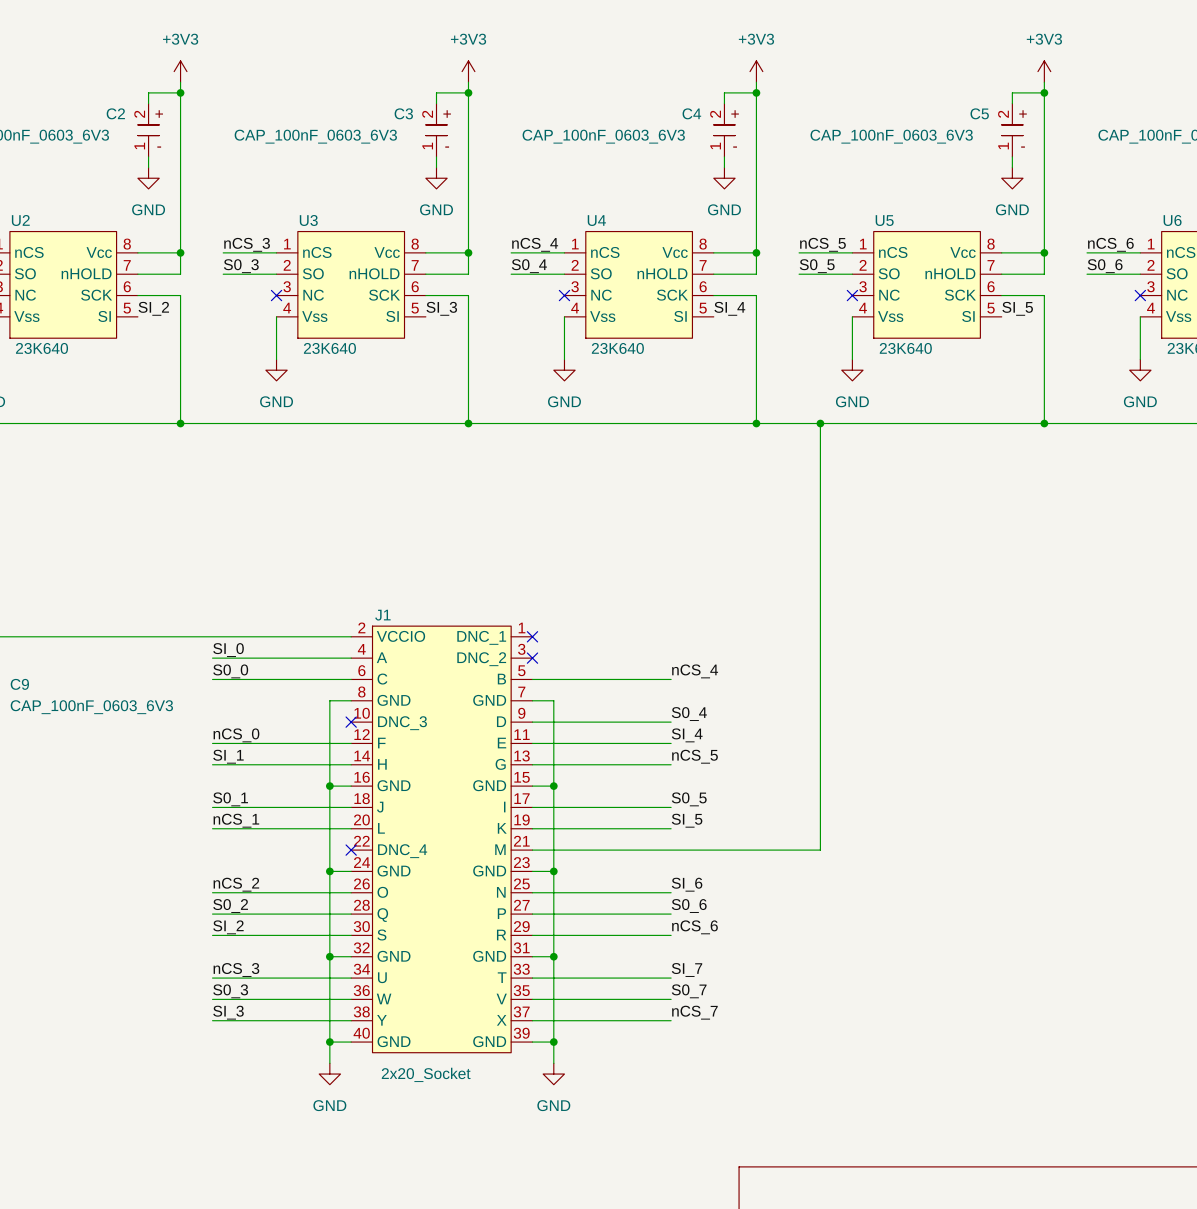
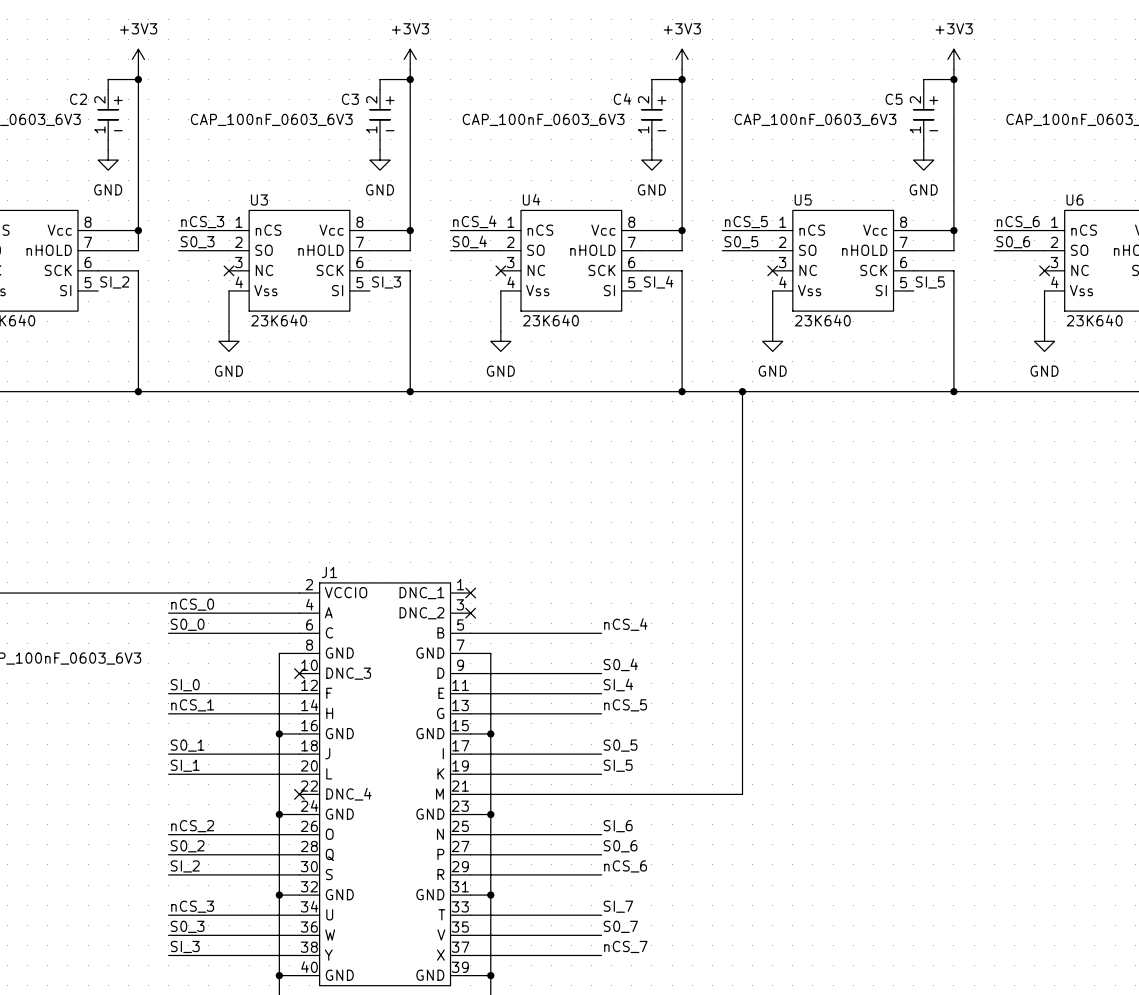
label: SI_0 (228, 650) -> nCS_0 (192, 604)
label: nCS_0 (236, 735) -> SI_0 (185, 685)
label: SI_1 (228, 756) -> nCS_1 (192, 705)
label: nCS_1 (236, 820) -> SI_1 (185, 765)

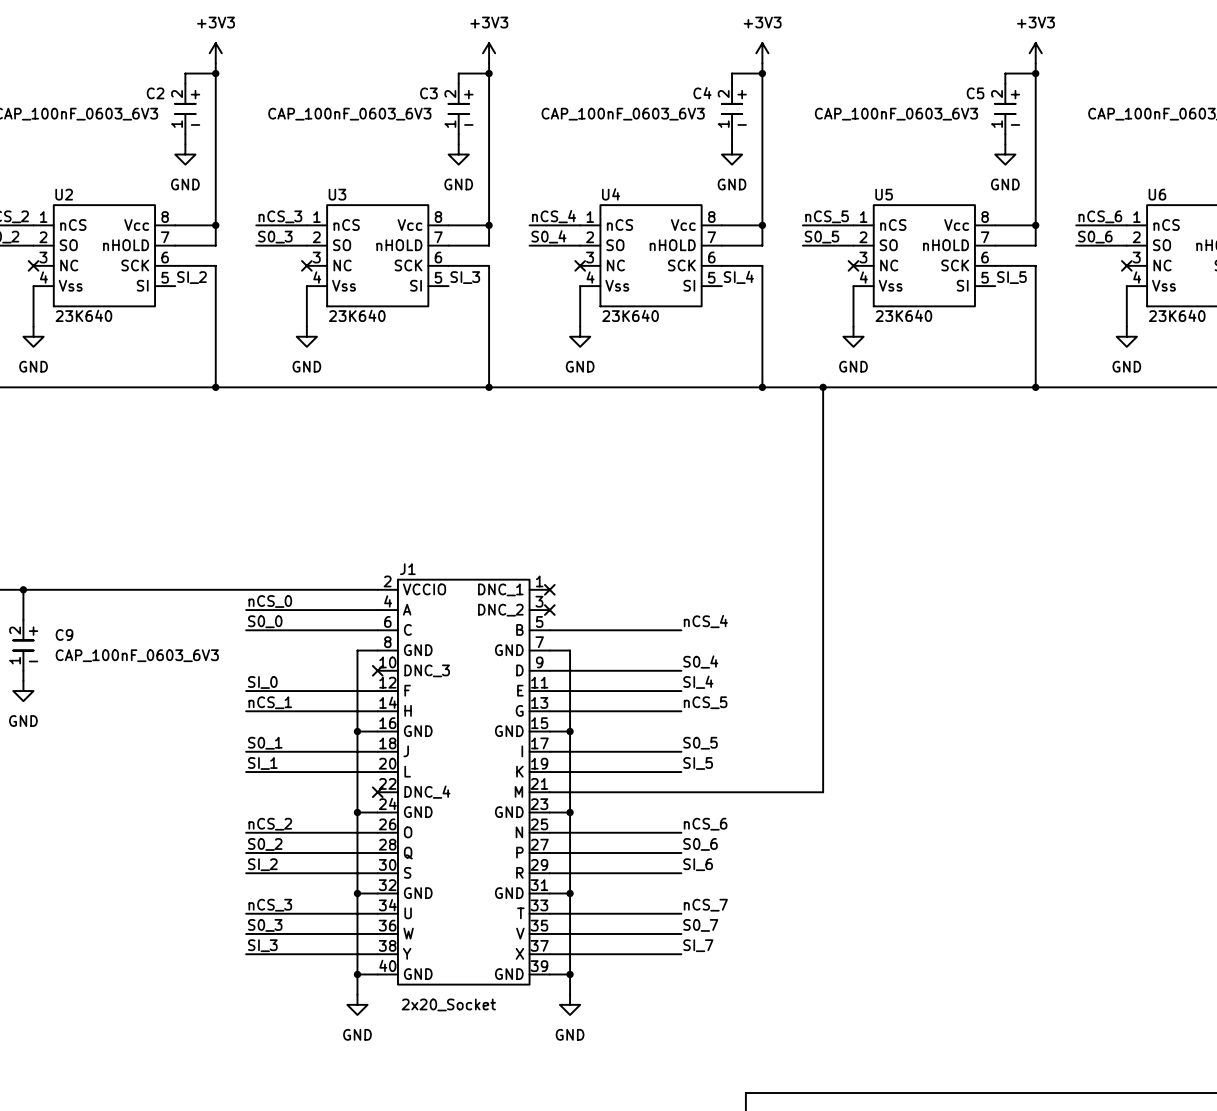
label: SI_6 (618, 826) -> nCS_6 (705, 824)
label: nCS_6 (625, 866) -> SI_6 (698, 864)
label: SI_7 (618, 906) -> nCS_7 (705, 905)
label: nCS_7 (625, 946) -> SI_7 (698, 945)

